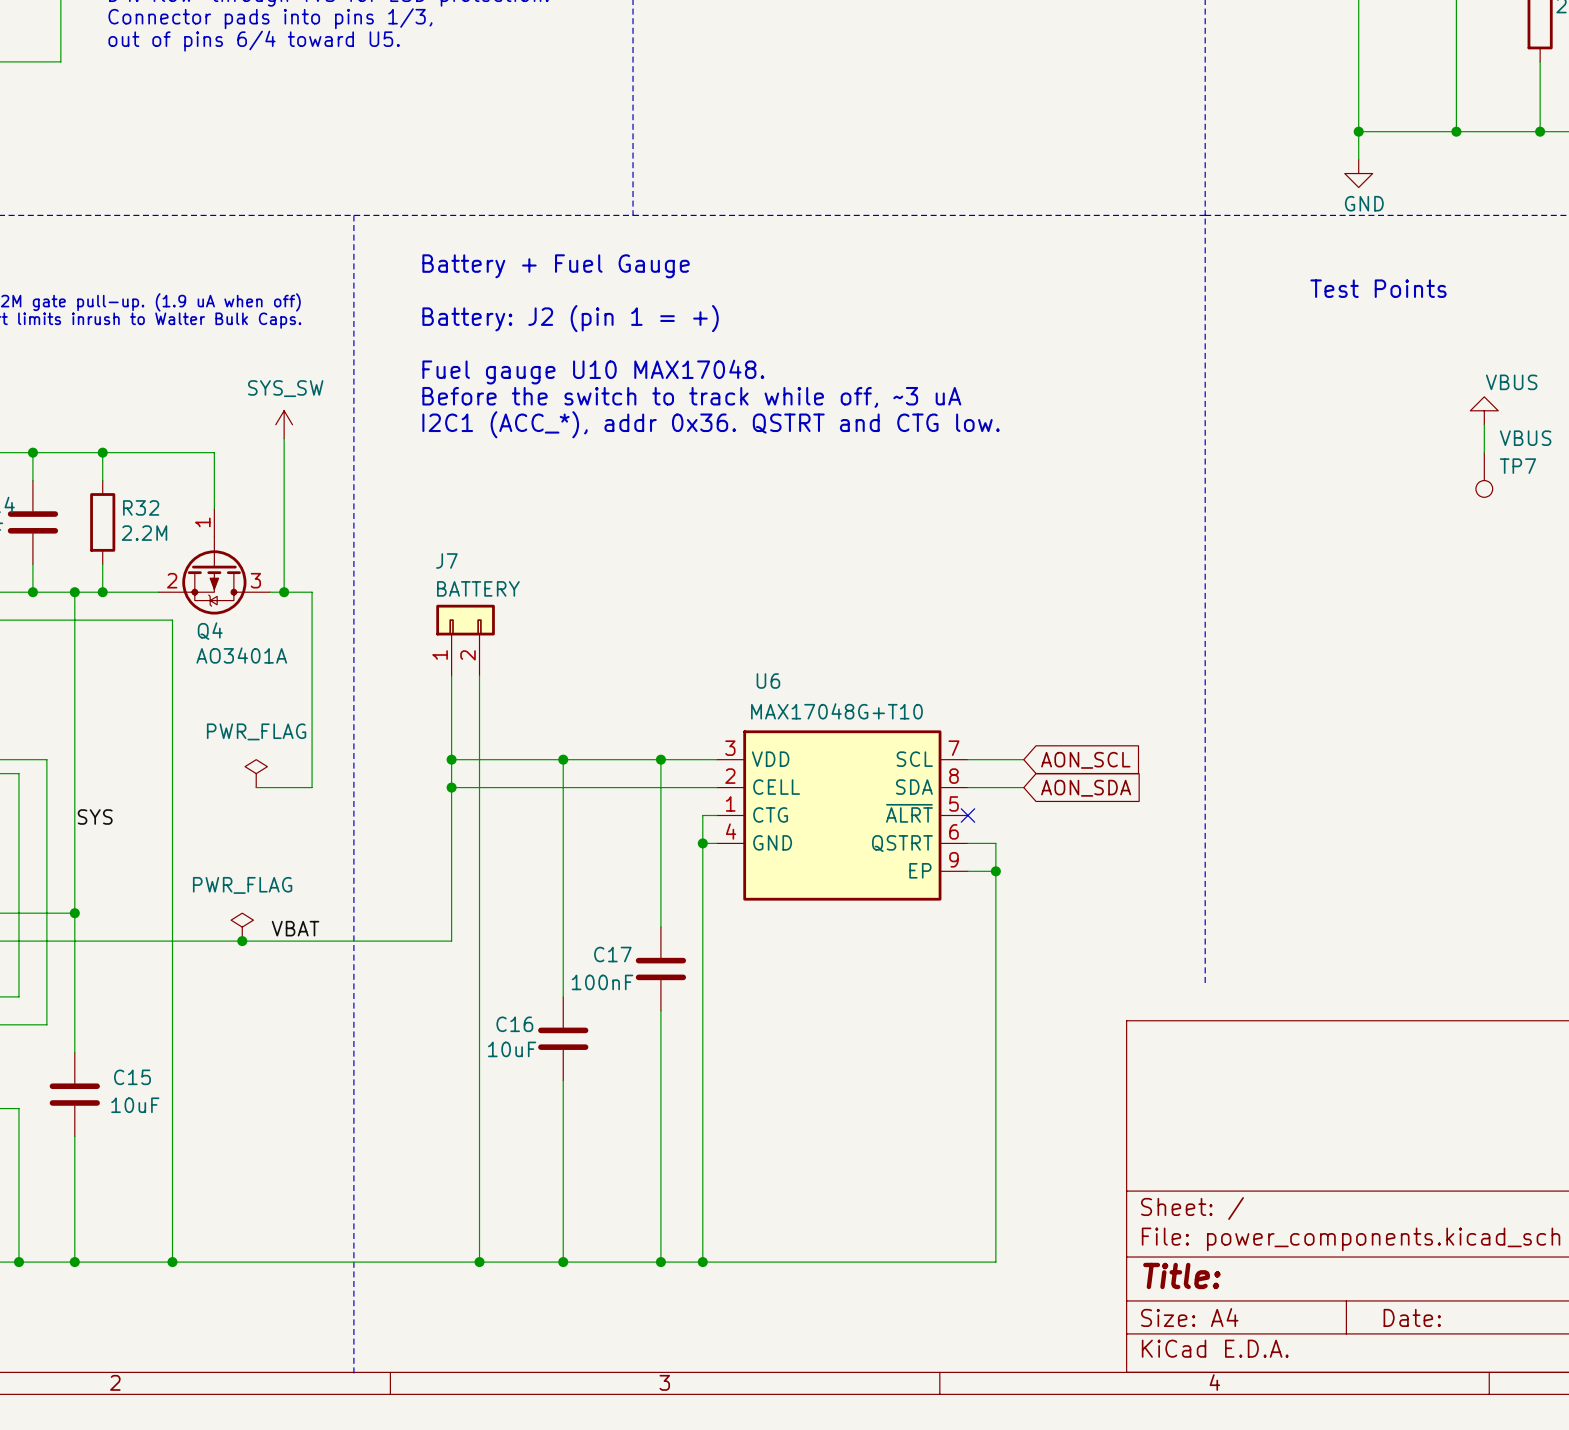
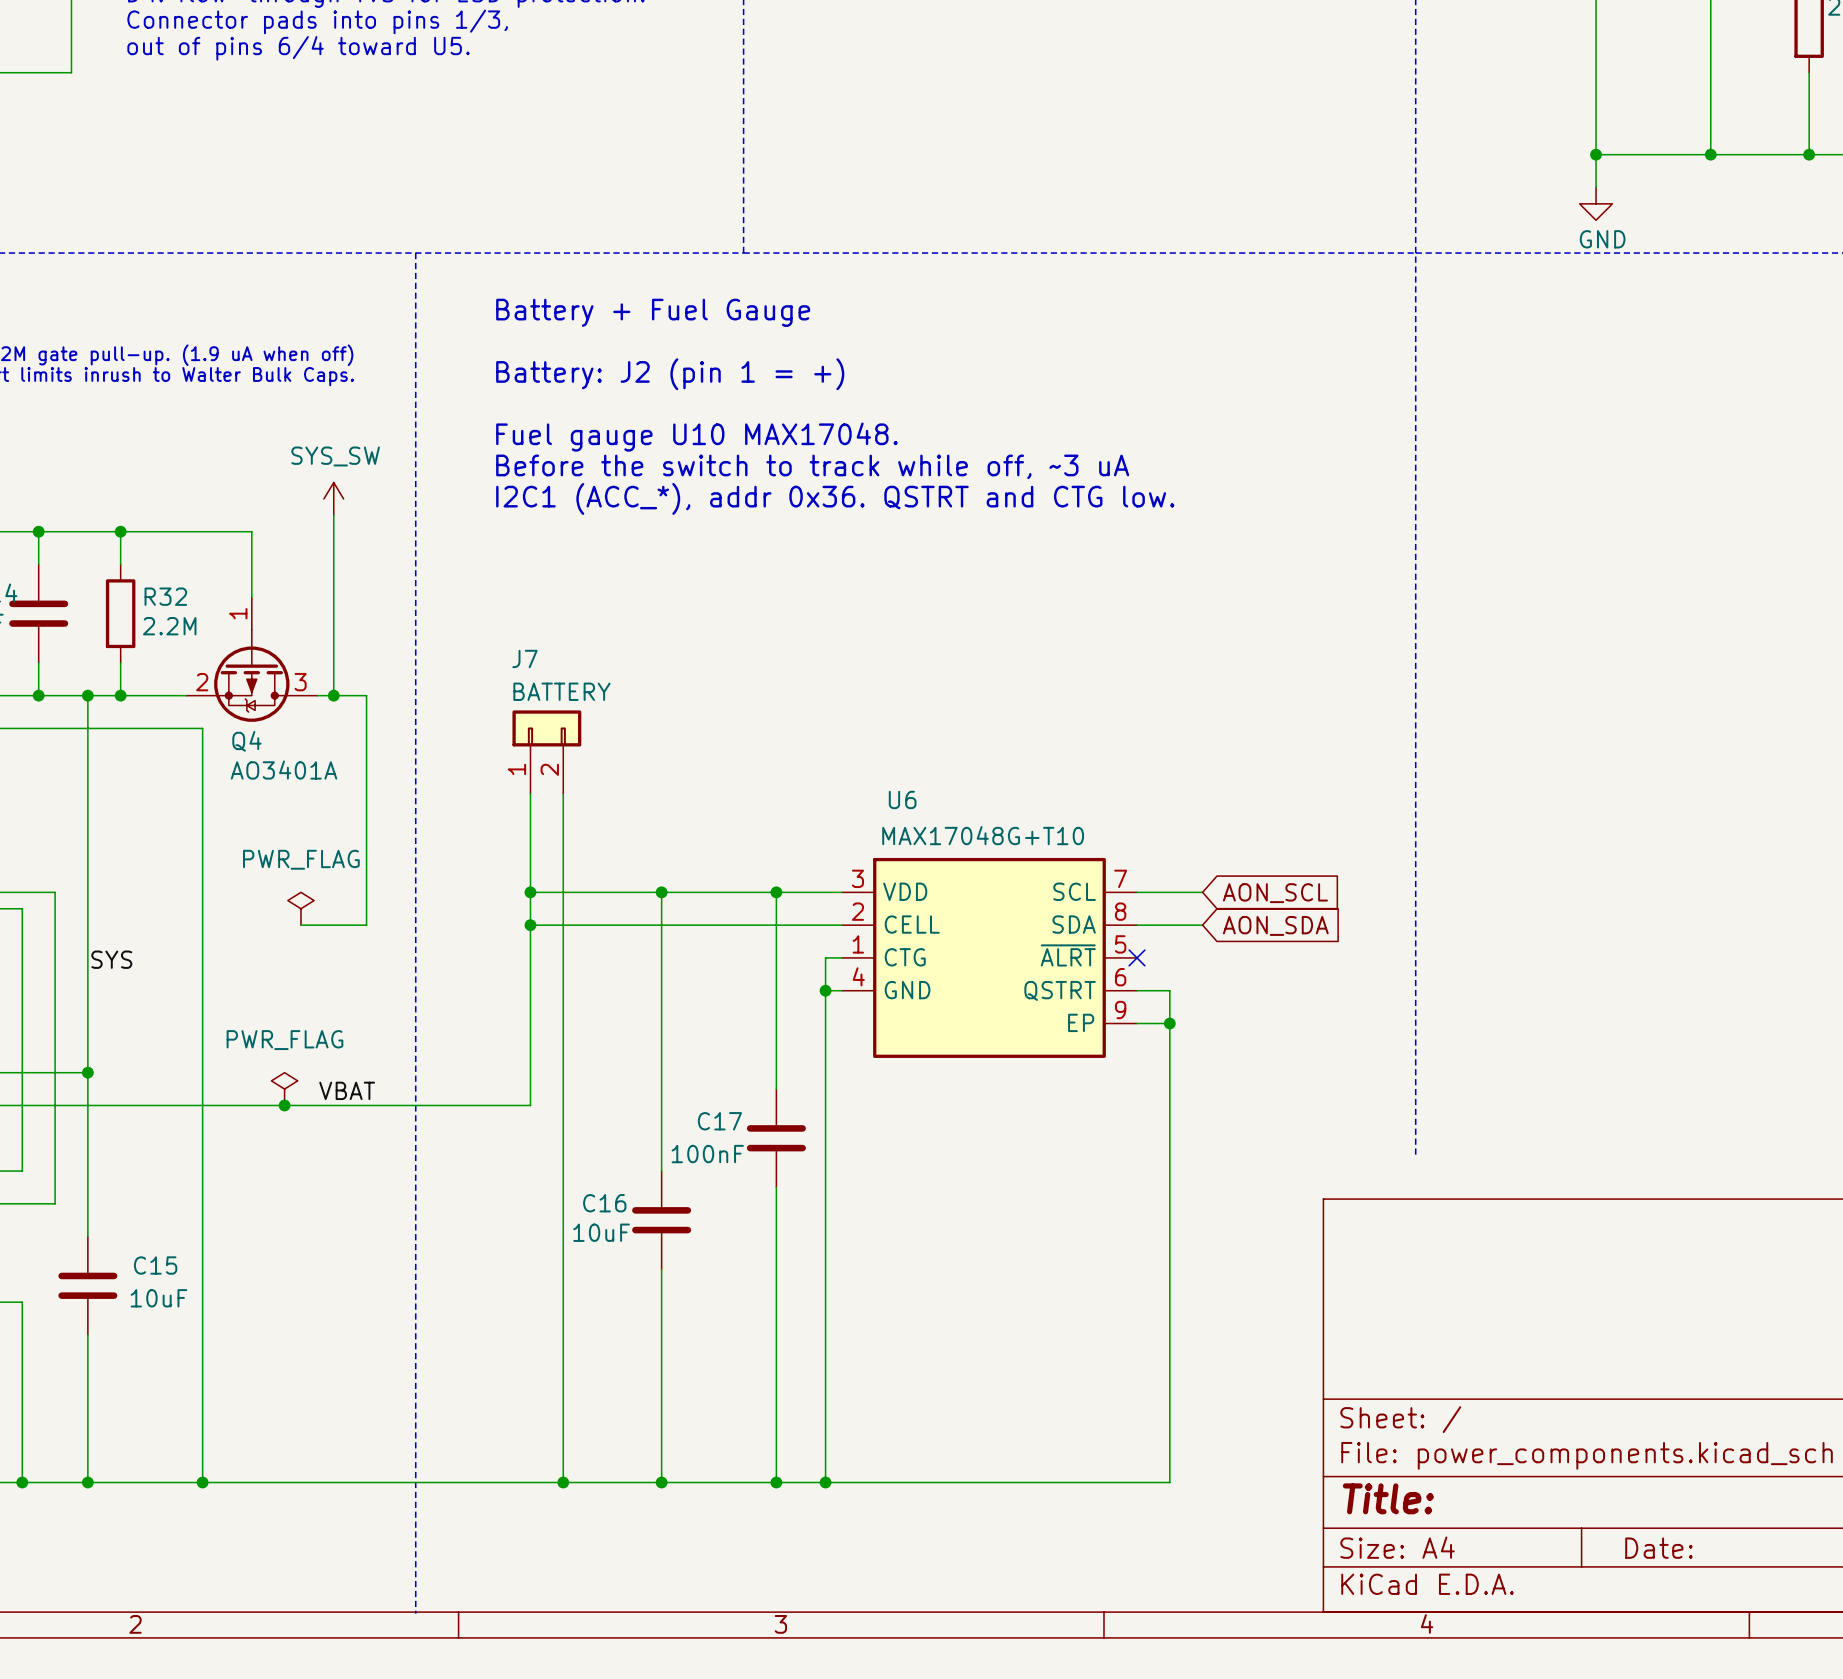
text: Test Points (1378, 288) -> none
power symbol: VBUS (1484, 410) -> none
wire: (1484, 424) (1484, 452) -> none
TP7: VBUS (1484, 474) -> none

